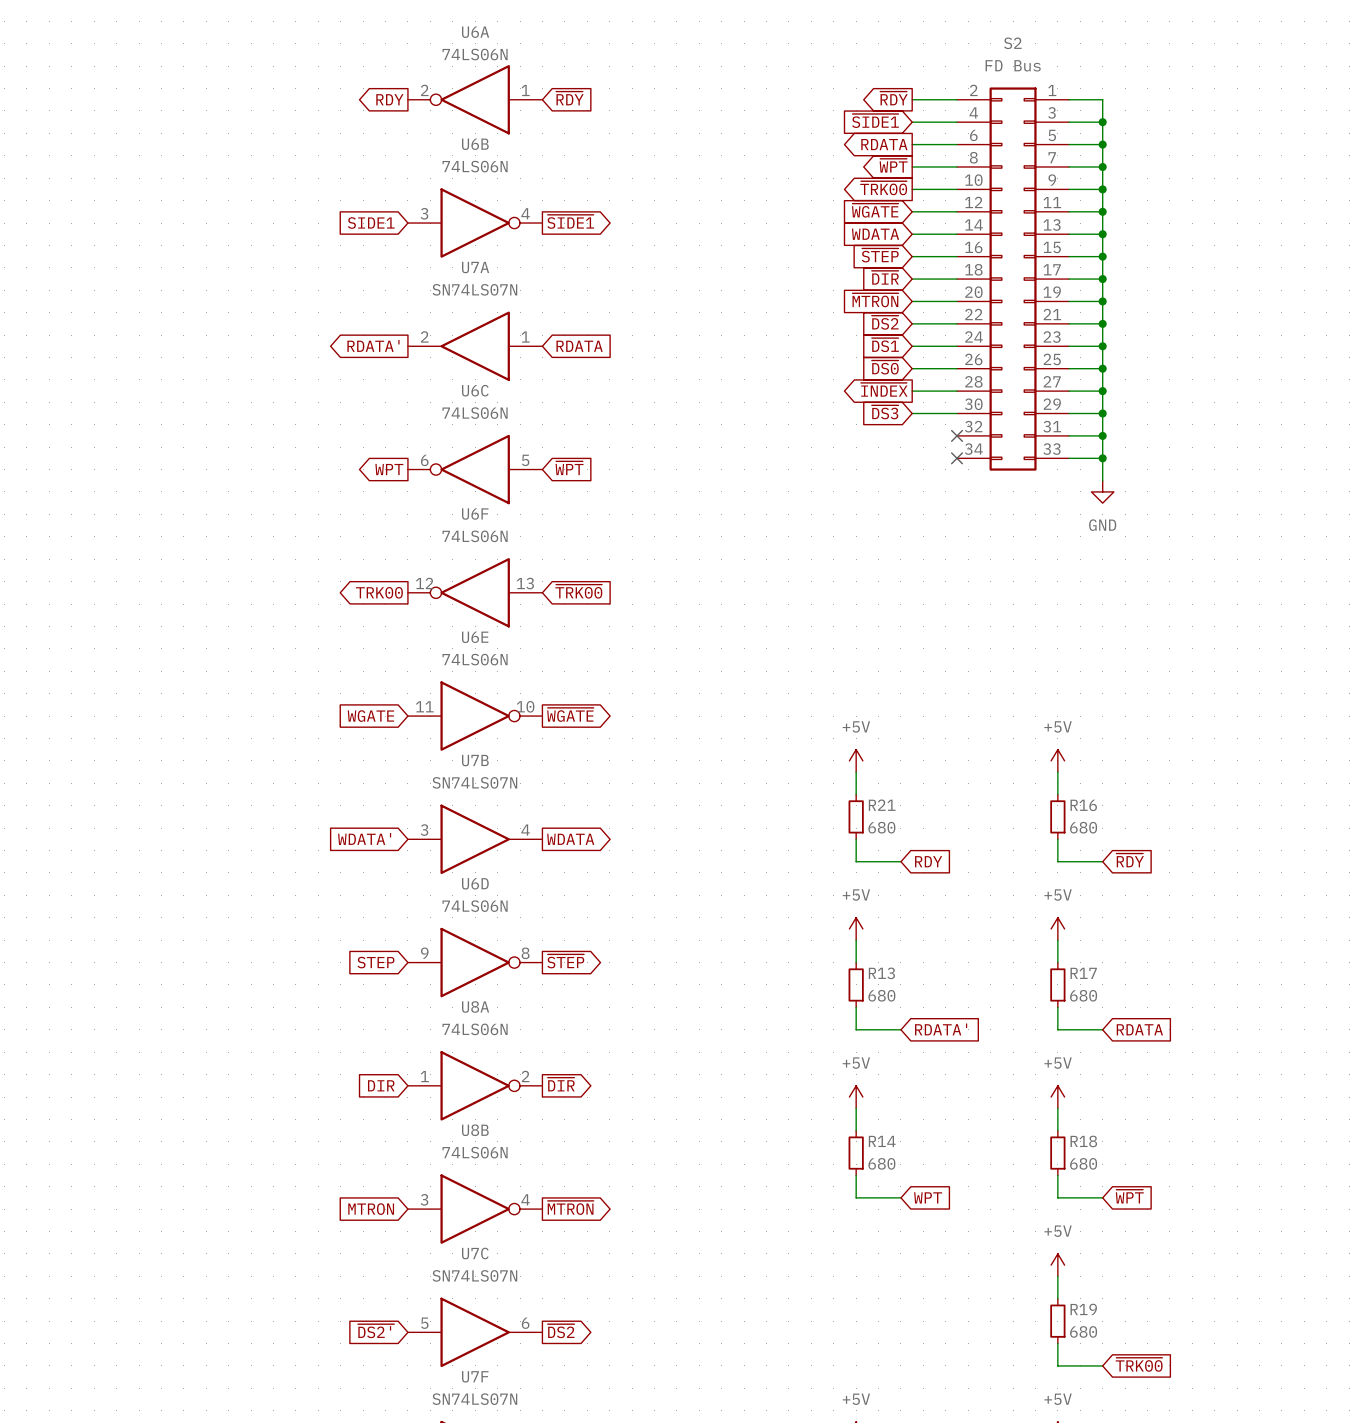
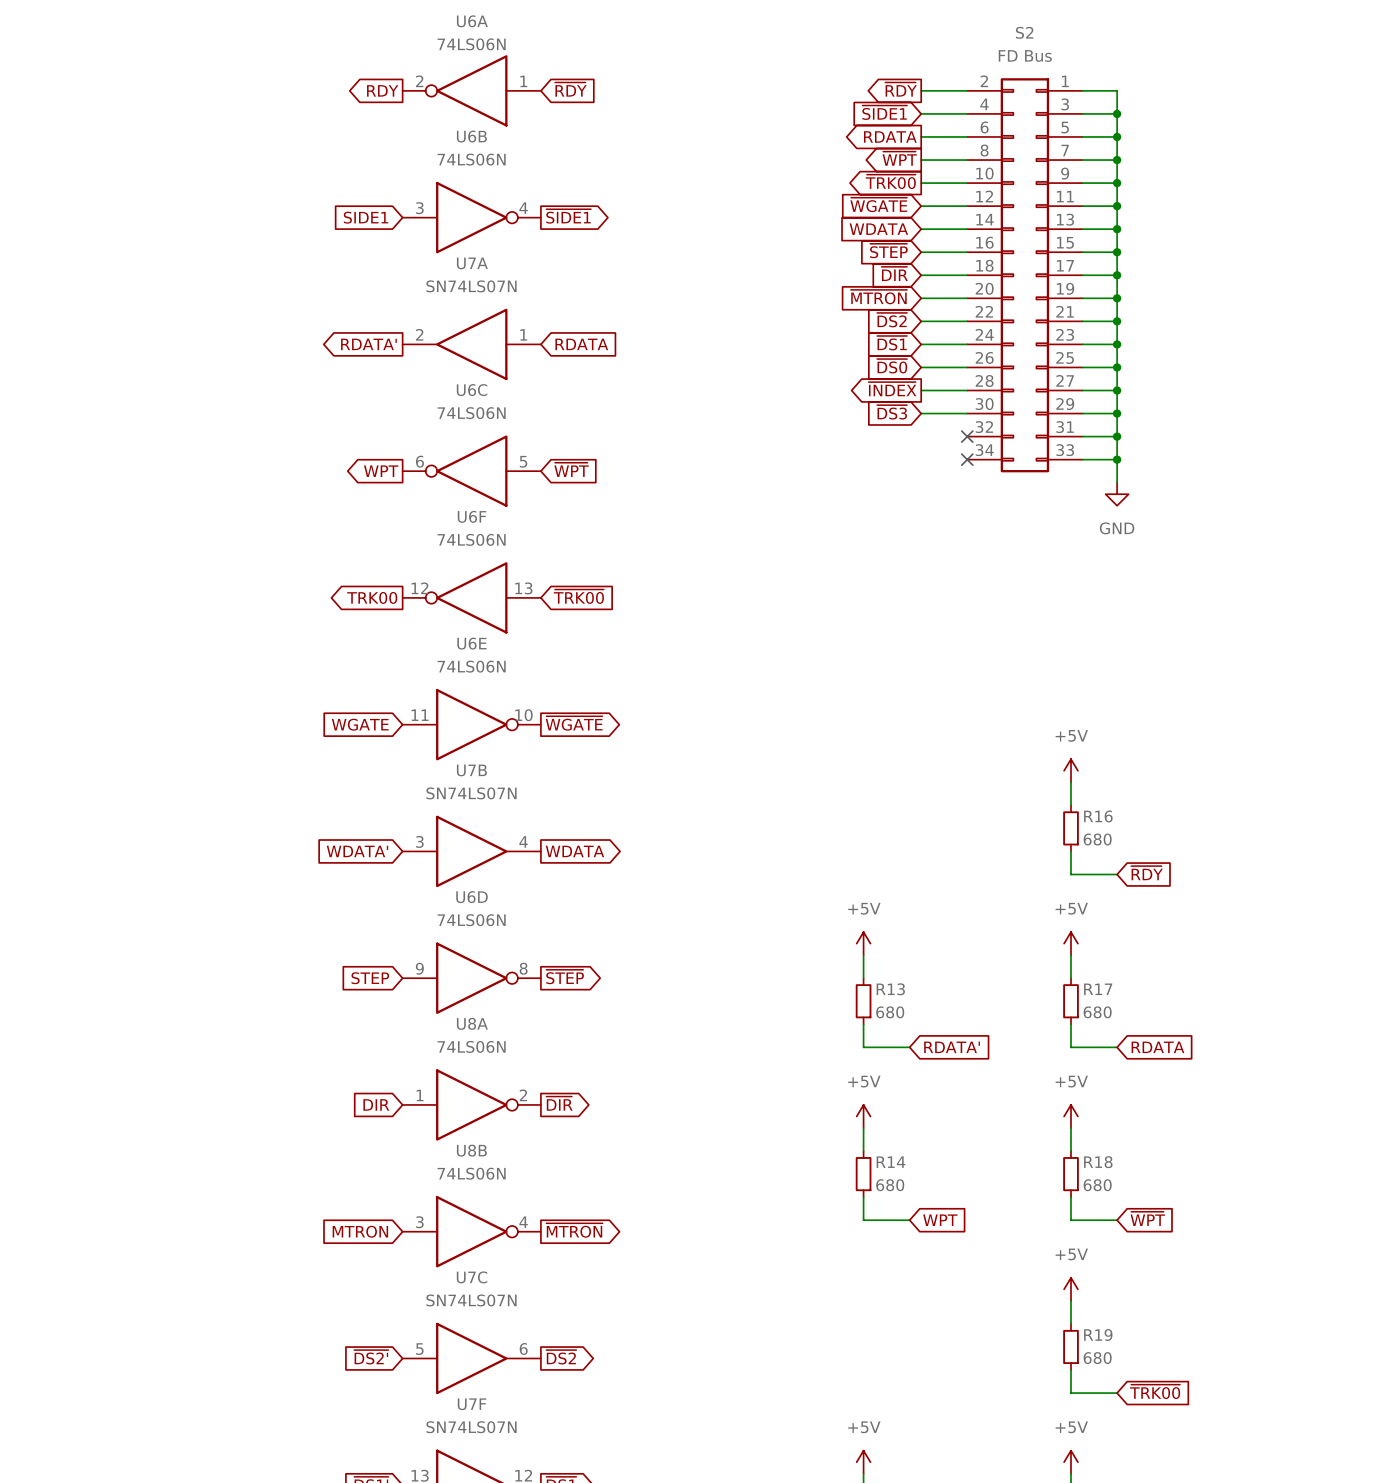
power symbol: +5V (856, 760) -> none
wire: (856, 772) (856, 794) -> none
R21: 680 (856, 816) -> none
wire: (856, 839) (856, 861) (900, 861) -> none
global label: RDY (928, 861) -> none

